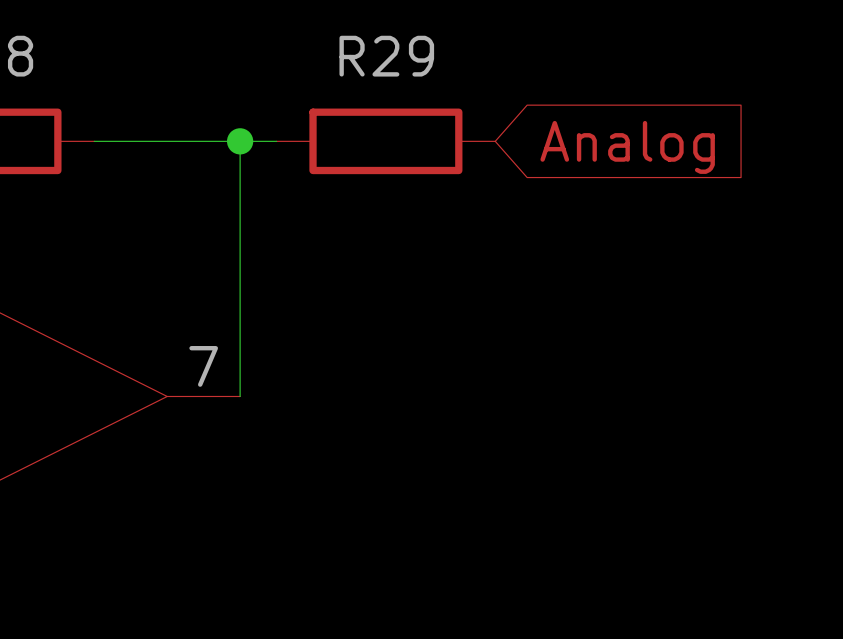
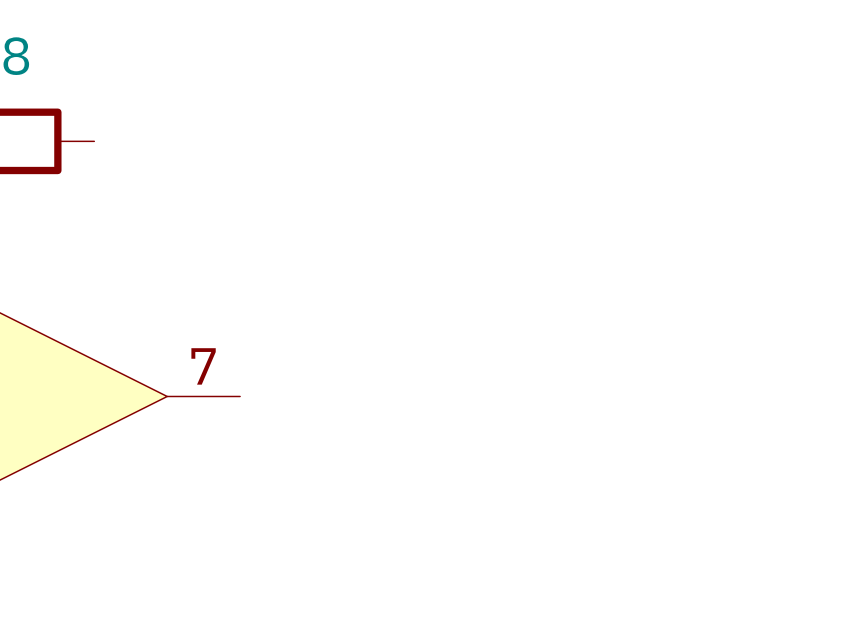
wire: (94, 141) (276, 141) -> none
wire: (240, 141) (240, 396) -> none
junction: (240, 141) -> none
R29: (385, 141) -> none
global label: Analog (627, 147) -> none

